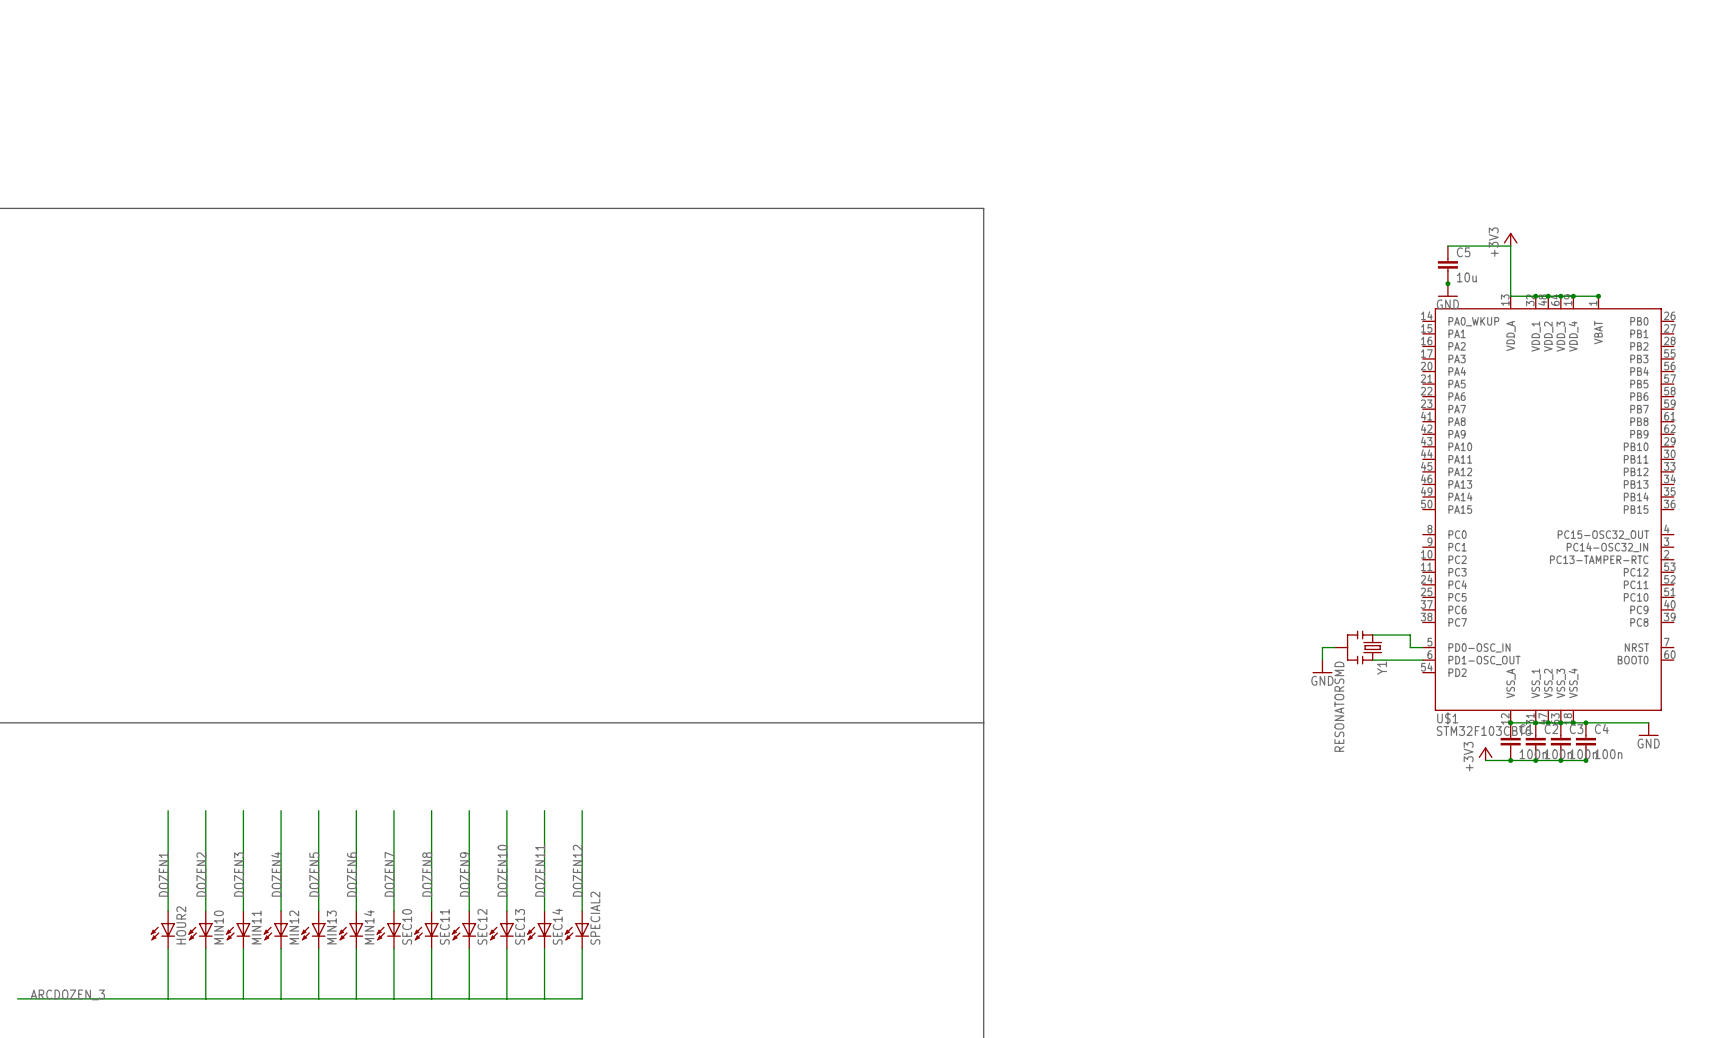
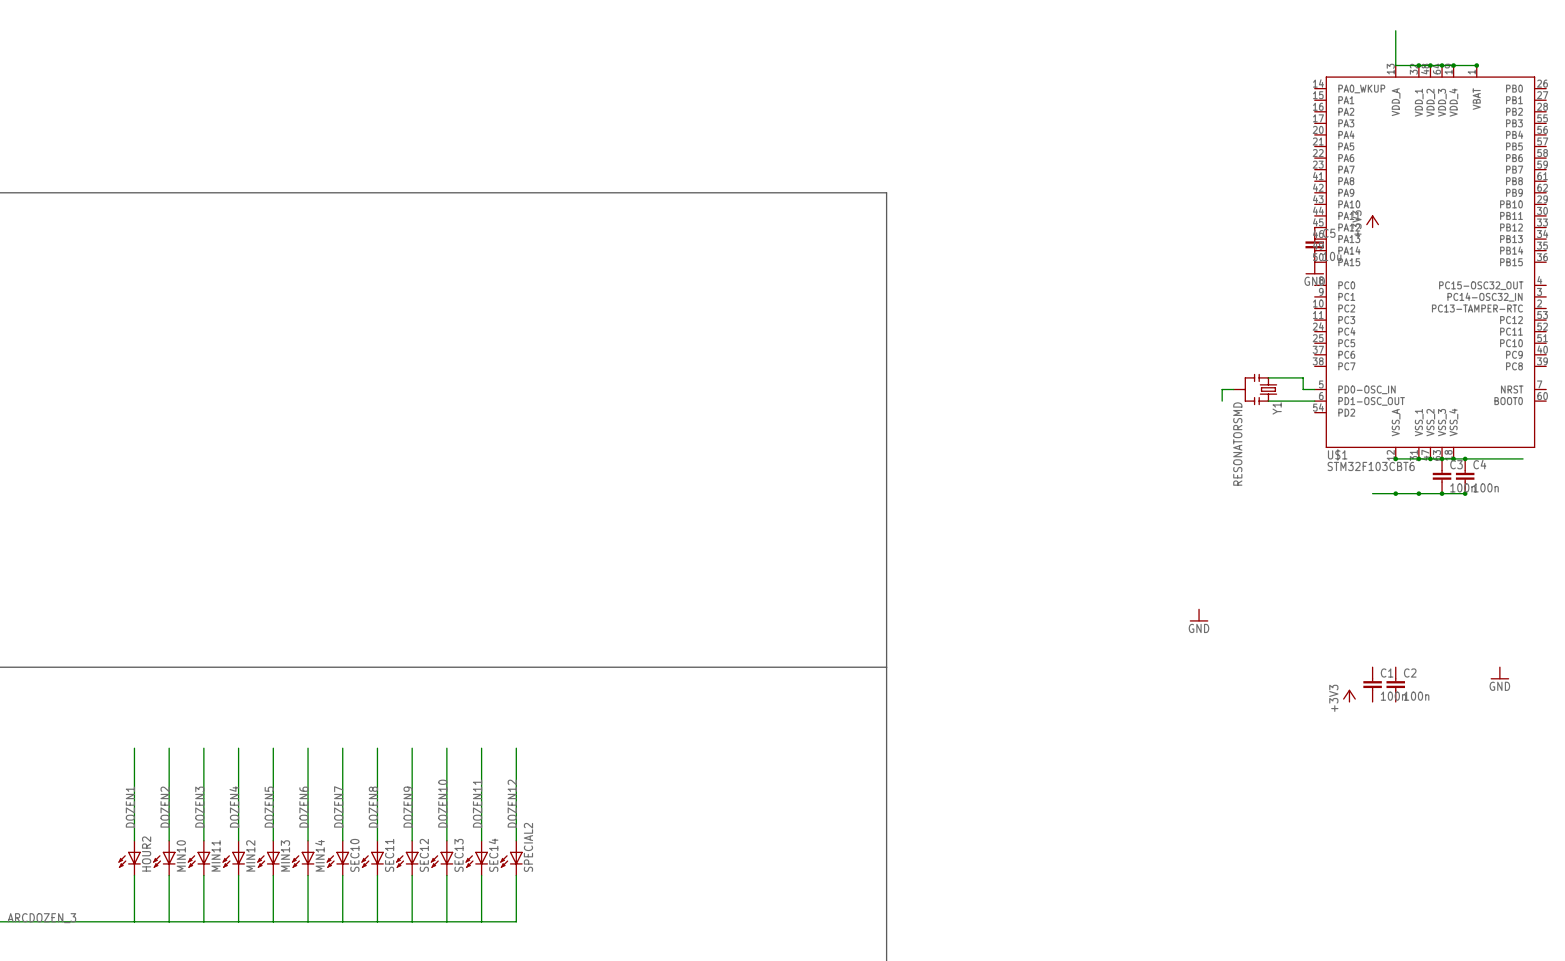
wire: none -> (1395, 30) (1395, 65) (1476, 65)
junction: none -> (1418, 65)
junction: none -> (1430, 65)
junction: none -> (1442, 65)
junction: none -> (1453, 65)
junction: none -> (1476, 65)
wire: (1447, 246) (1510, 246) (1510, 296) (1598, 296) -> none
junction: (1447, 283) -> none
junction: (1535, 296) -> none
junction: (1548, 296) -> none
junction: (1560, 296) -> none
junction: (1573, 296) -> none
junction: (1598, 296) -> none
wire: none -> (1268, 377) (1303, 377) (1303, 389) (1314, 389)
wire: none -> (1233, 389) (1222, 389) (1222, 401)
wire: none -> (1268, 401) (1314, 401)
wire: none -> (1395, 458) (1523, 458)
junction: none -> (1395, 458)
junction: none -> (1418, 458)
junction: none -> (1430, 458)
junction: none -> (1442, 458)
junction: none -> (1453, 458)
junction: none -> (1465, 458)
U$1 position: (1548, 509) -> (1430, 262)
wire: none -> (1372, 493) (1465, 493)
junction: none -> (1395, 493)
junction: none -> (1418, 493)
junction: none -> (1442, 493)
junction: none -> (1465, 493)
wire: (1372, 635) (1410, 635) (1410, 647) (1422, 647) -> none
wire: (1335, 647) (1322, 647) (1322, 660) -> none
Y1 position: (1358, 647) -> (1255, 389)
wire: (1372, 660) (1422, 660) -> none
wire: (1510, 722) (1648, 722) -> none
junction: (1510, 722) -> none
junction: (1535, 722) -> none
junction: (1548, 722) -> none
junction: (1560, 722) -> none
junction: (1573, 722) -> none
junction: (1585, 722) -> none
C3 position: (1560, 741) -> (1442, 476)
C4 position: (1585, 741) -> (1465, 476)
wire: (1485, 760) (1585, 760) -> none
junction: (1510, 760) -> none
junction: (1535, 760) -> none
junction: (1560, 760) -> none
junction: (1585, 760) -> none

